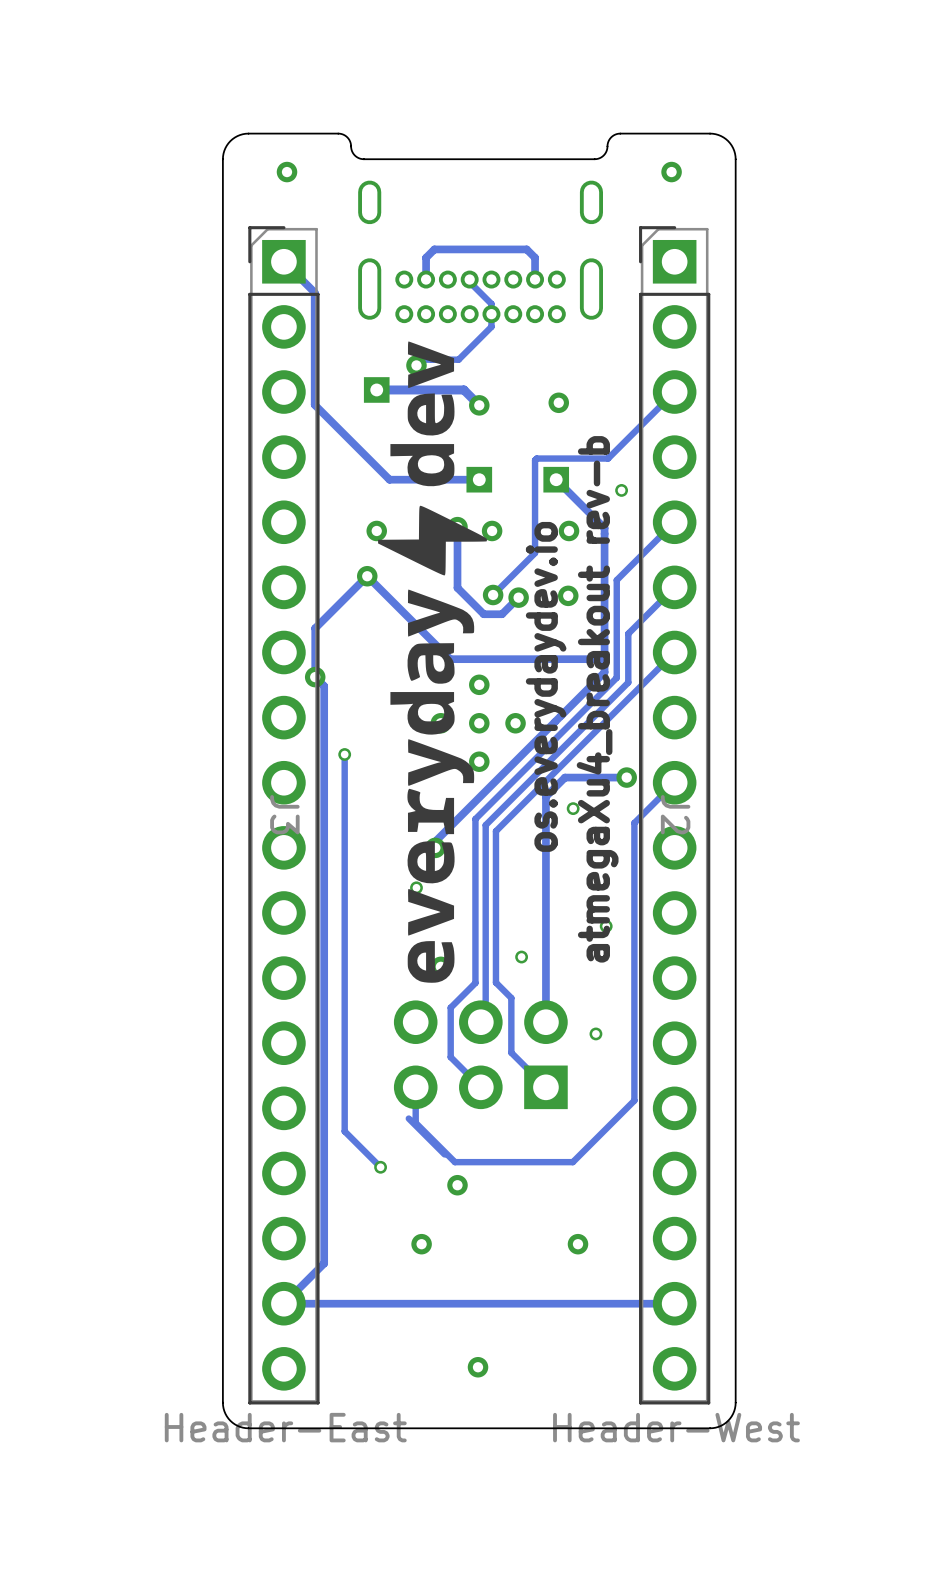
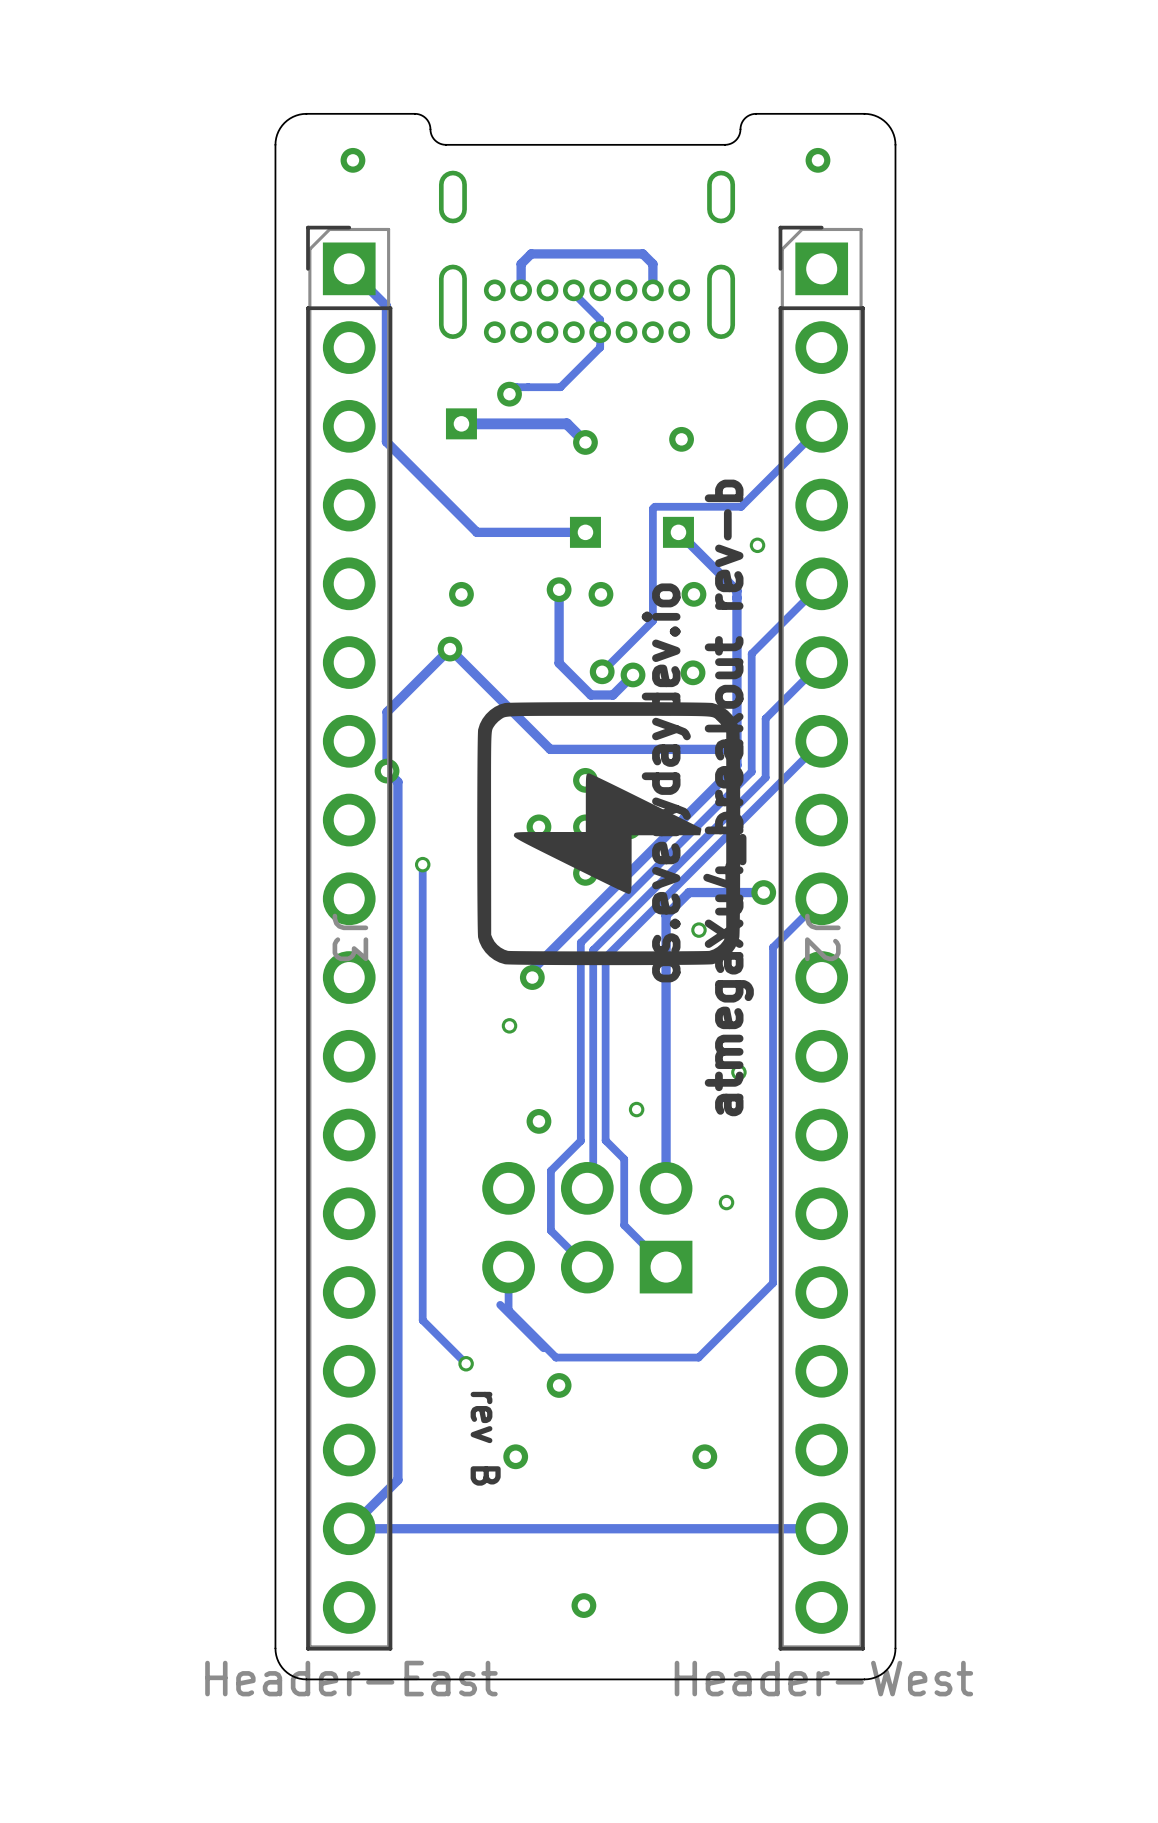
drawing: [378, 341, 487, 983] -> none
drawing: none -> [477, 702, 741, 966]
text: none -> rev B (485, 1438)

